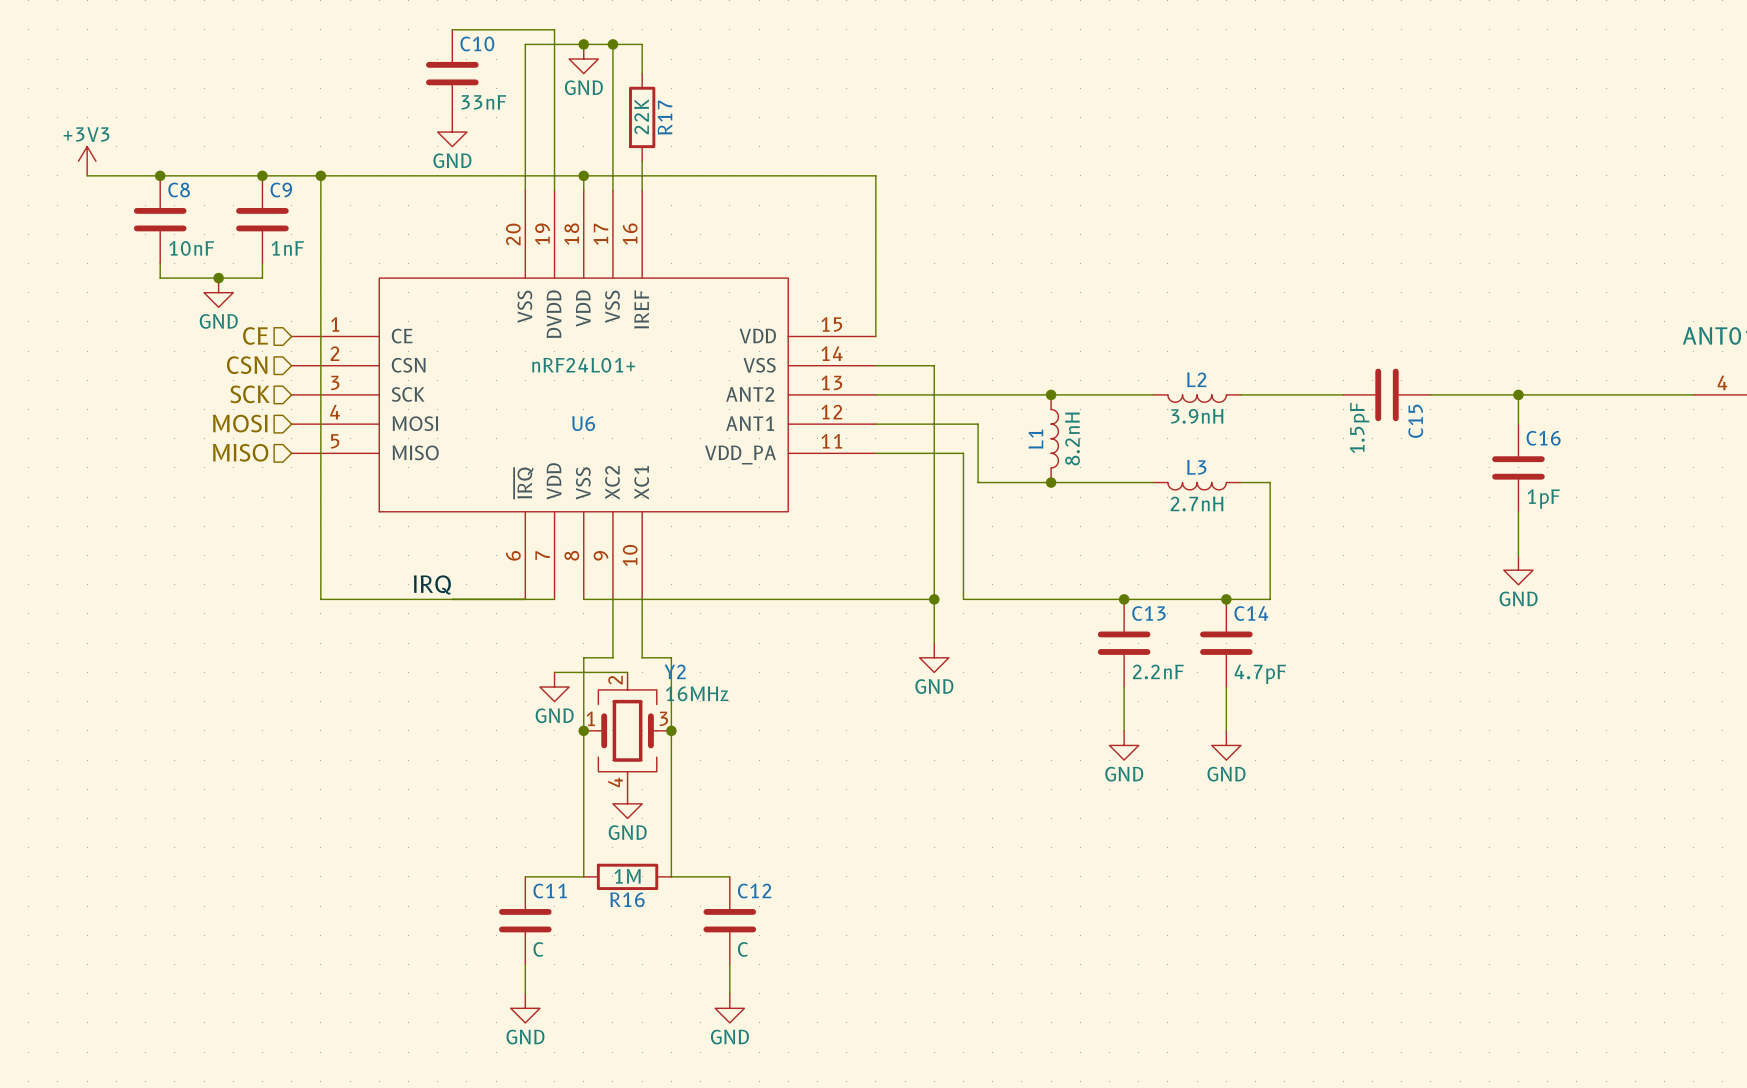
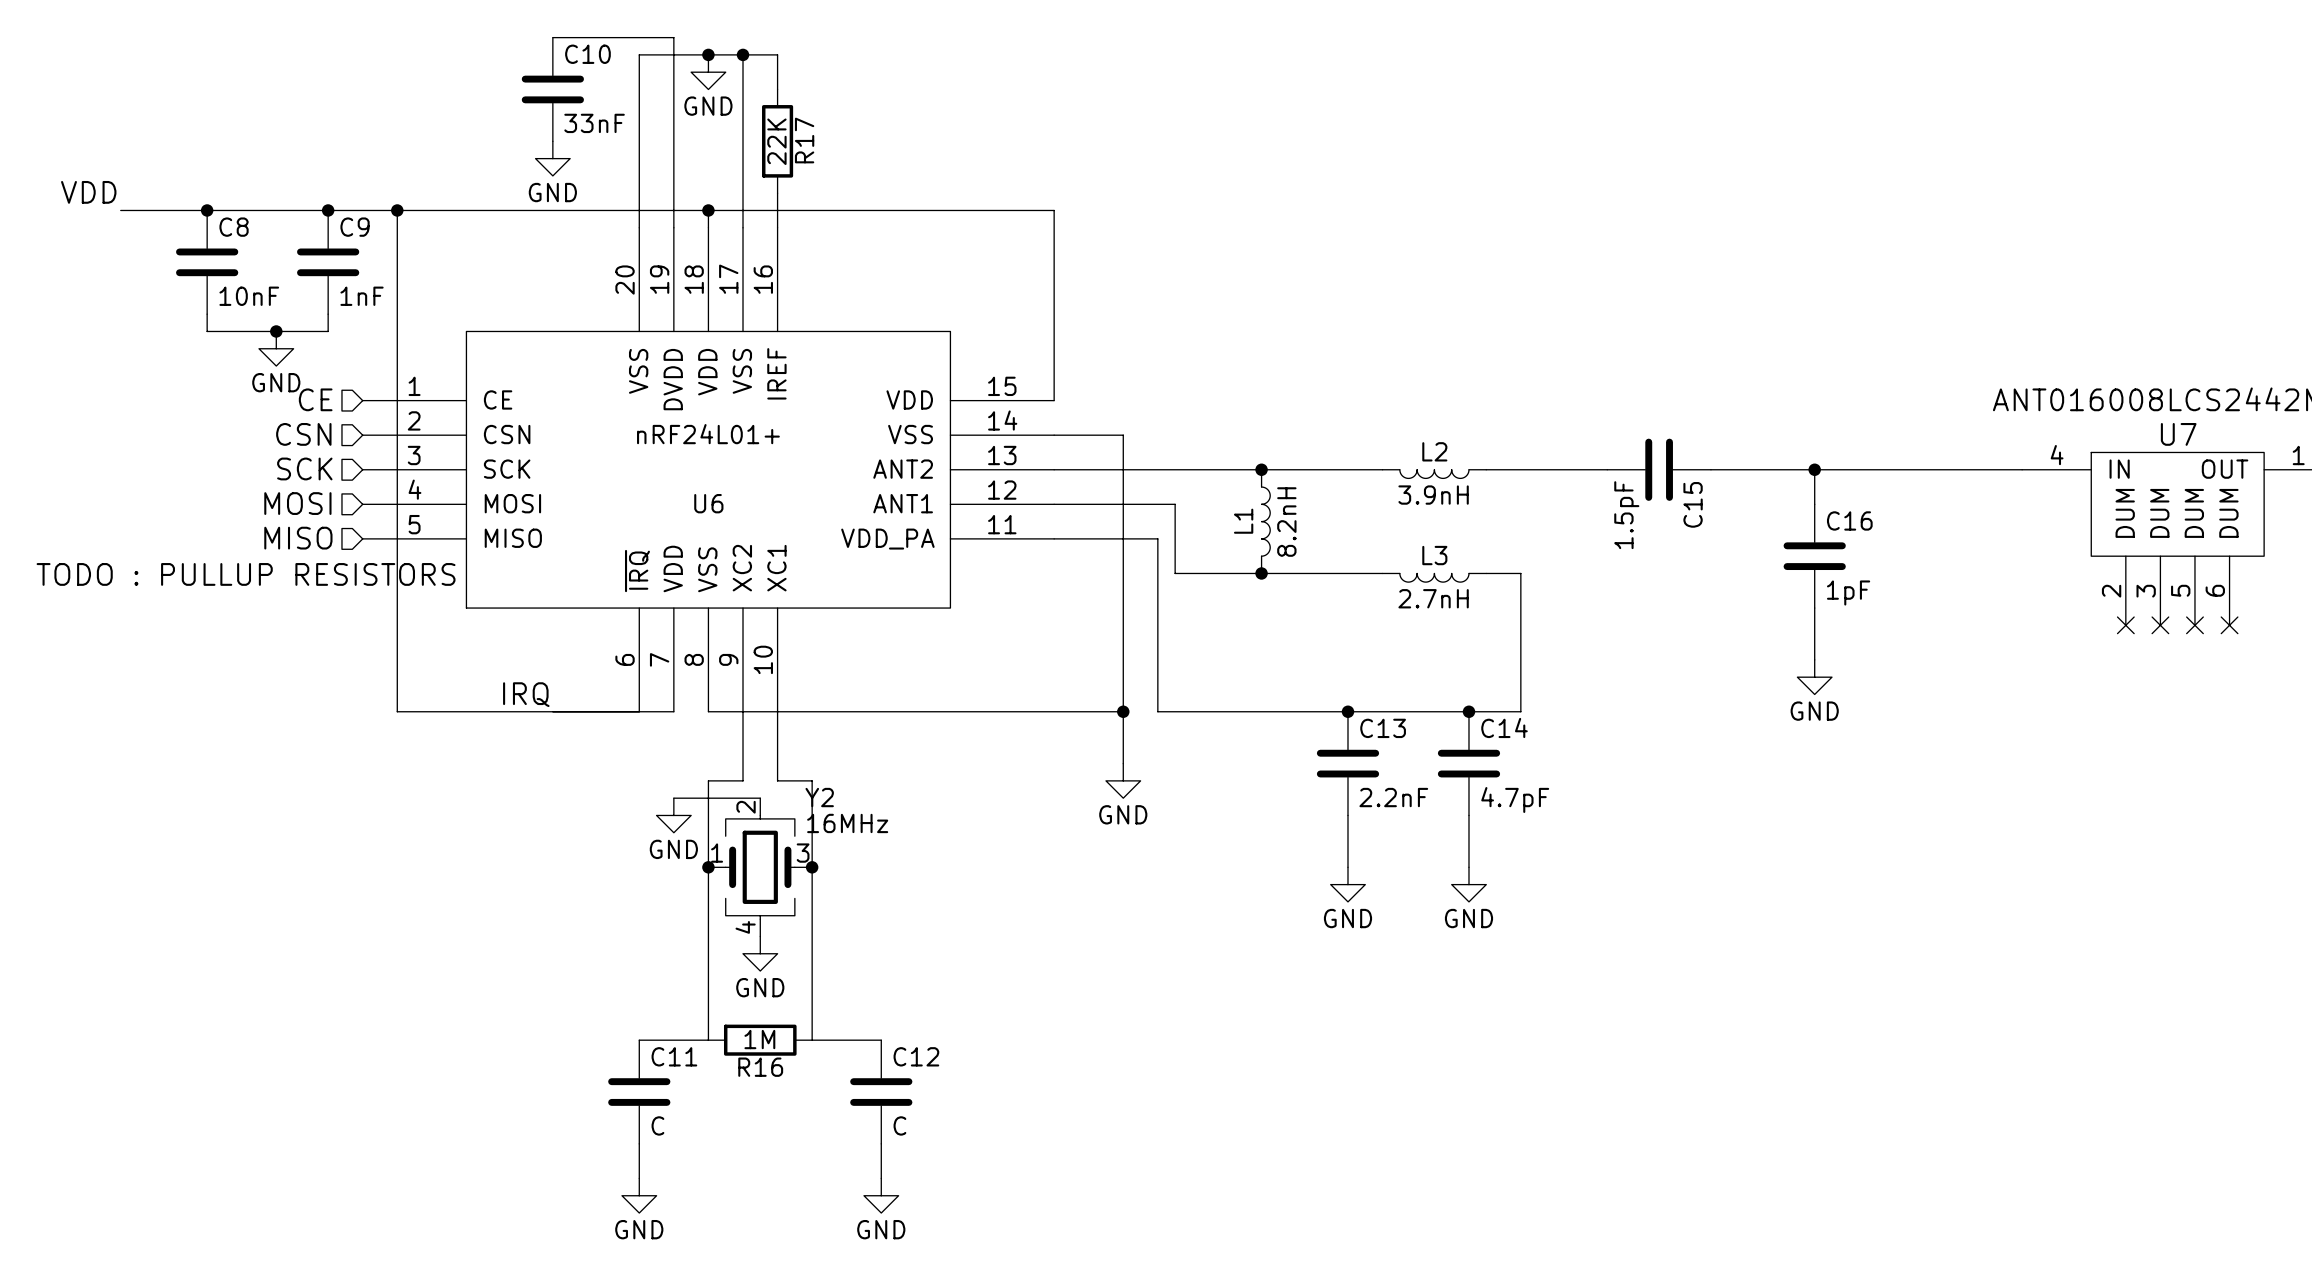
label: none -> VDD (88, 192)
power symbol: +3V3 (87, 161) -> none
text: none -> TODO : PULLUP RESISTORS (246, 574)

